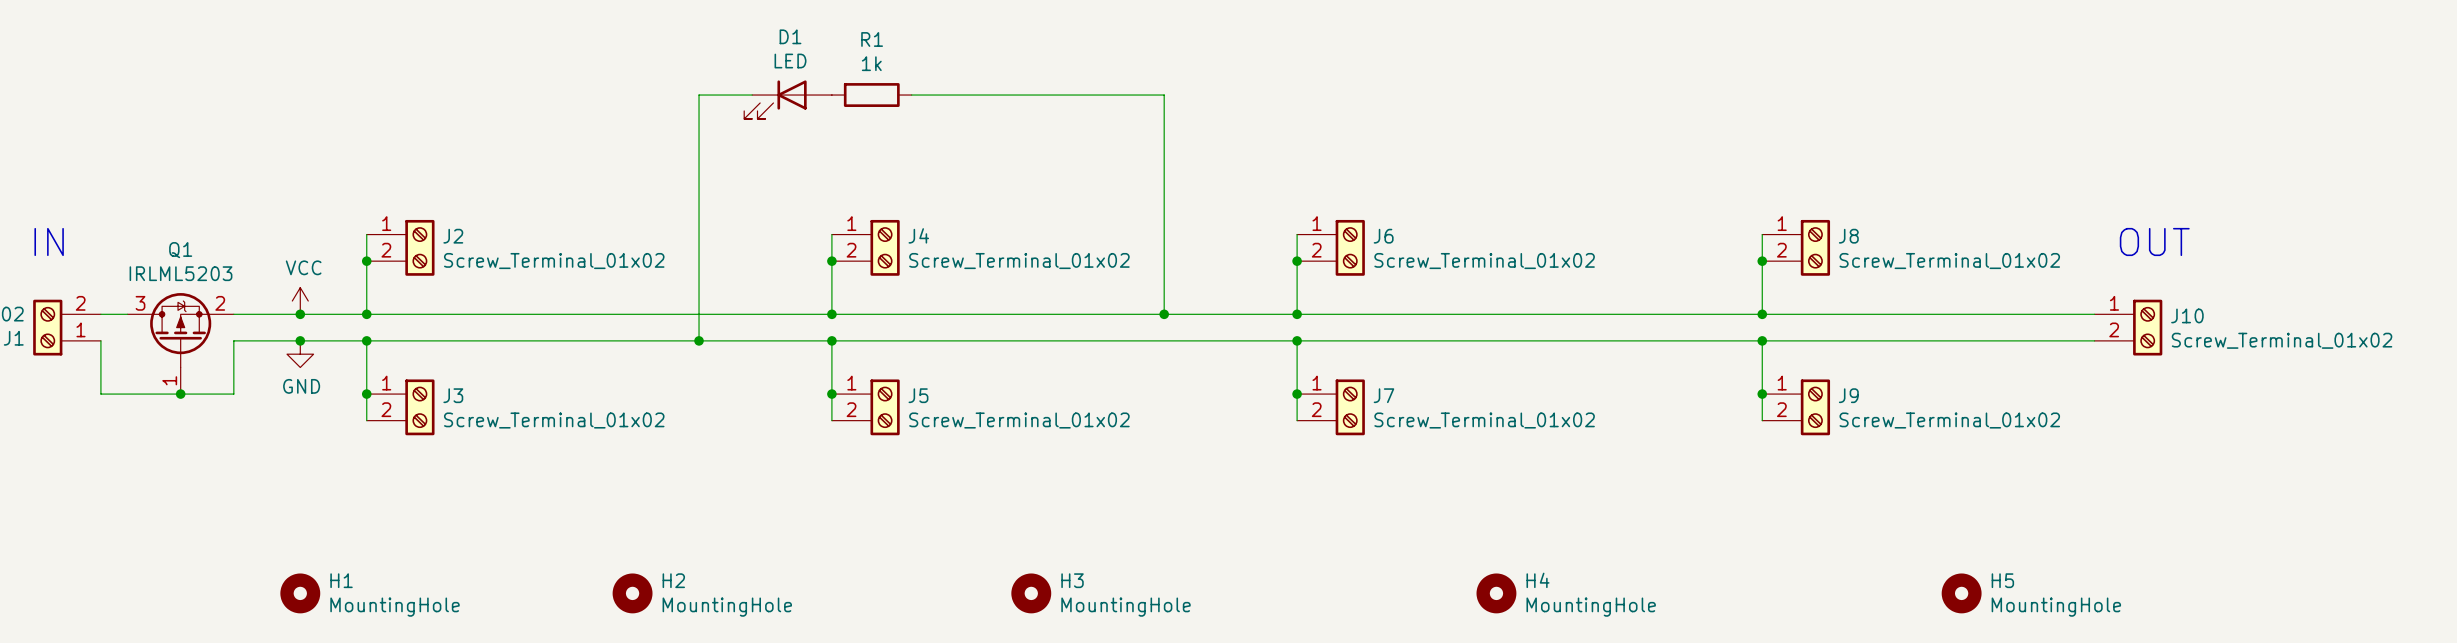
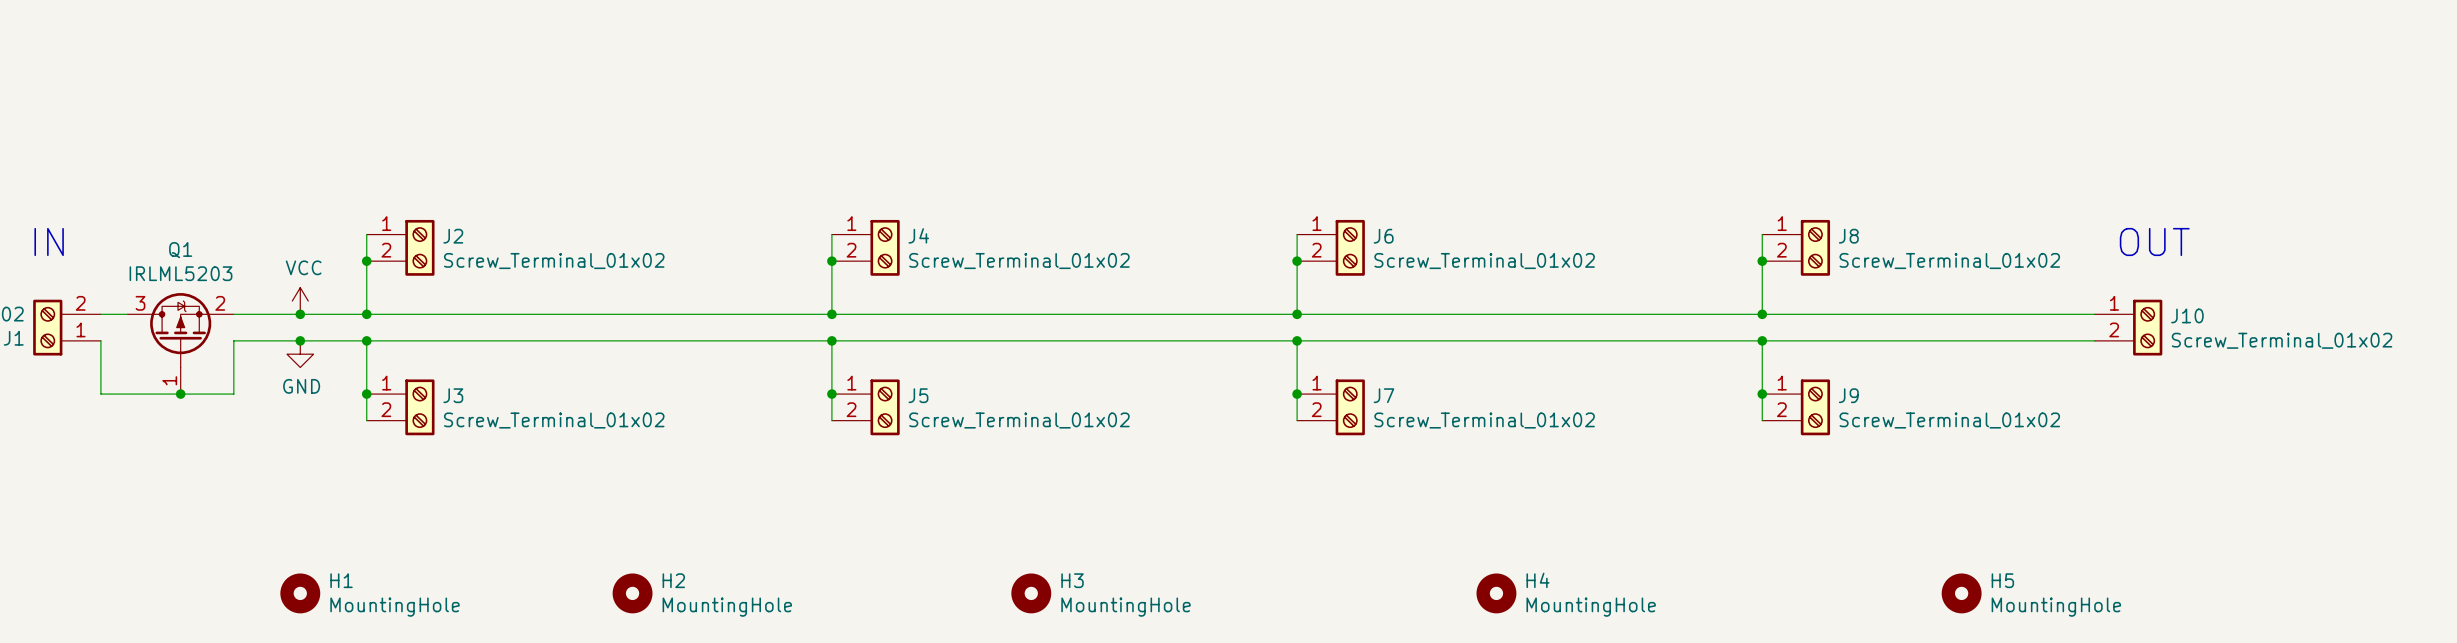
wire: (752, 95) (699, 95) (699, 340) -> none
R1: 1k (871, 95) -> none
wire: (911, 95) (1164, 95) (1164, 314) -> none
D1: LED (788, 99) -> none
junction: (1164, 314) -> none
junction: (699, 340) -> none

